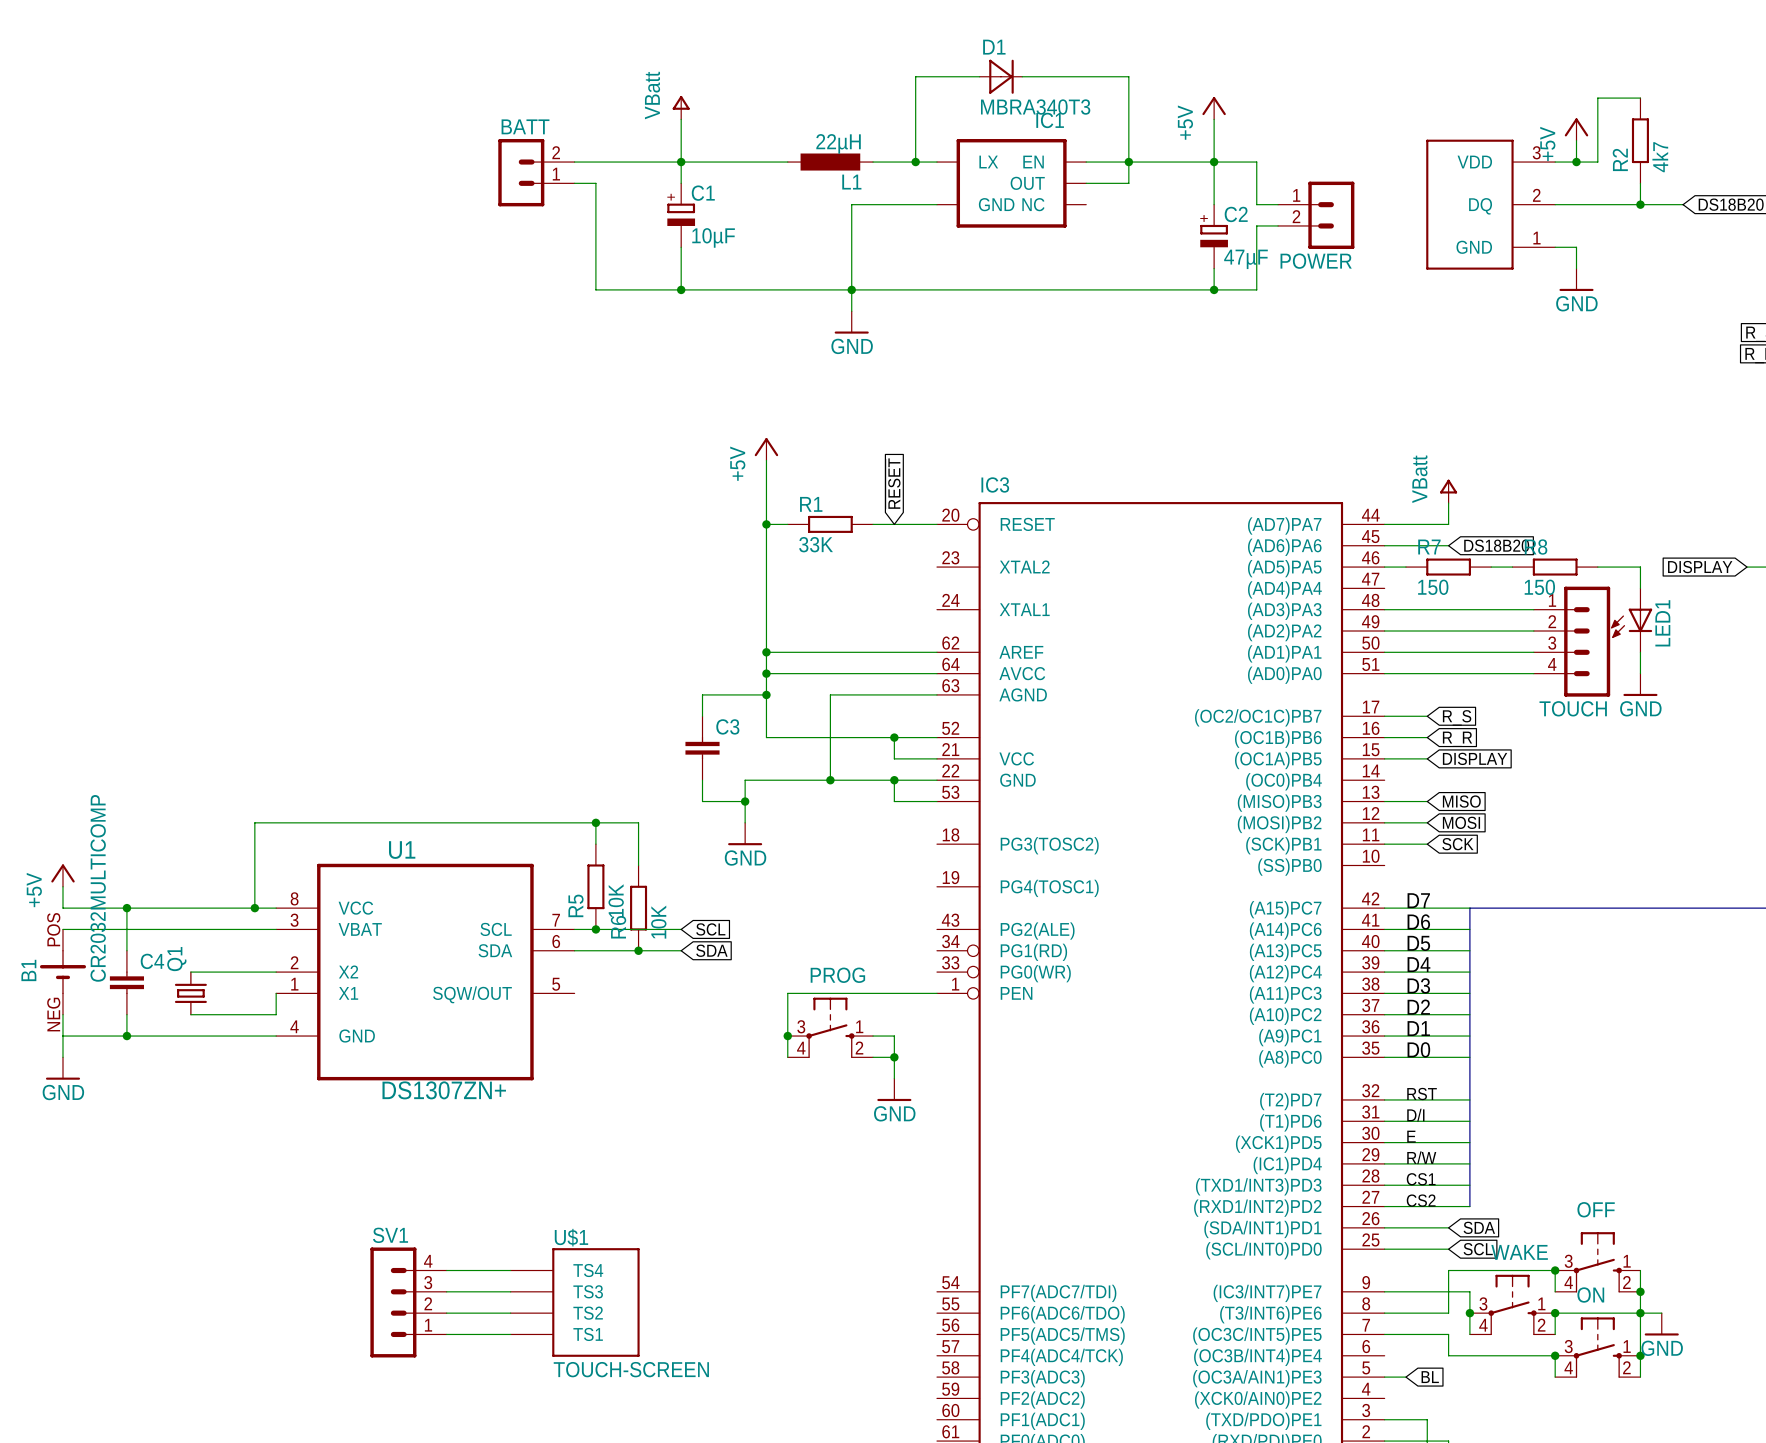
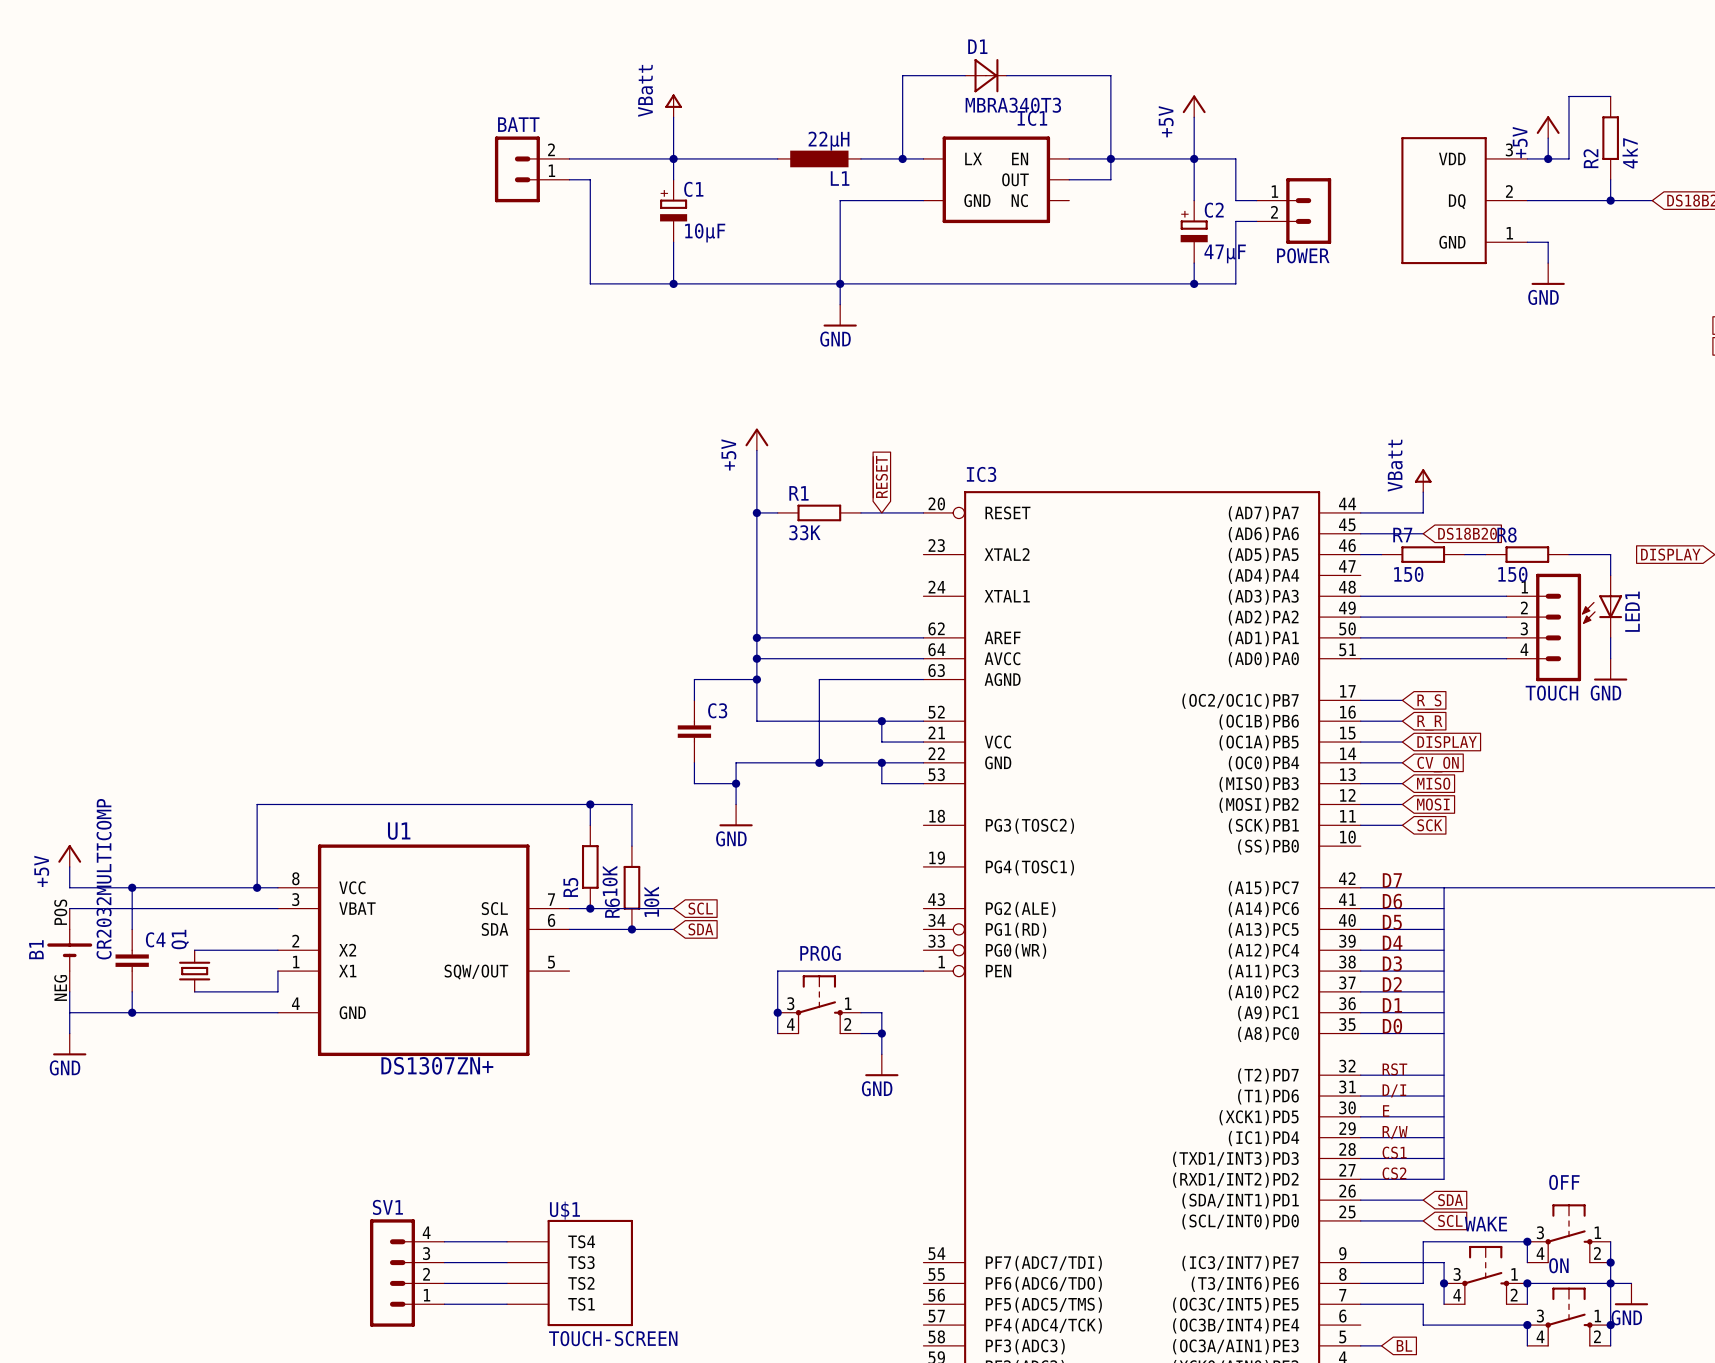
wire: none -> (1360, 762) (1402, 762)
global label: none -> CV_ON (1438, 764)

